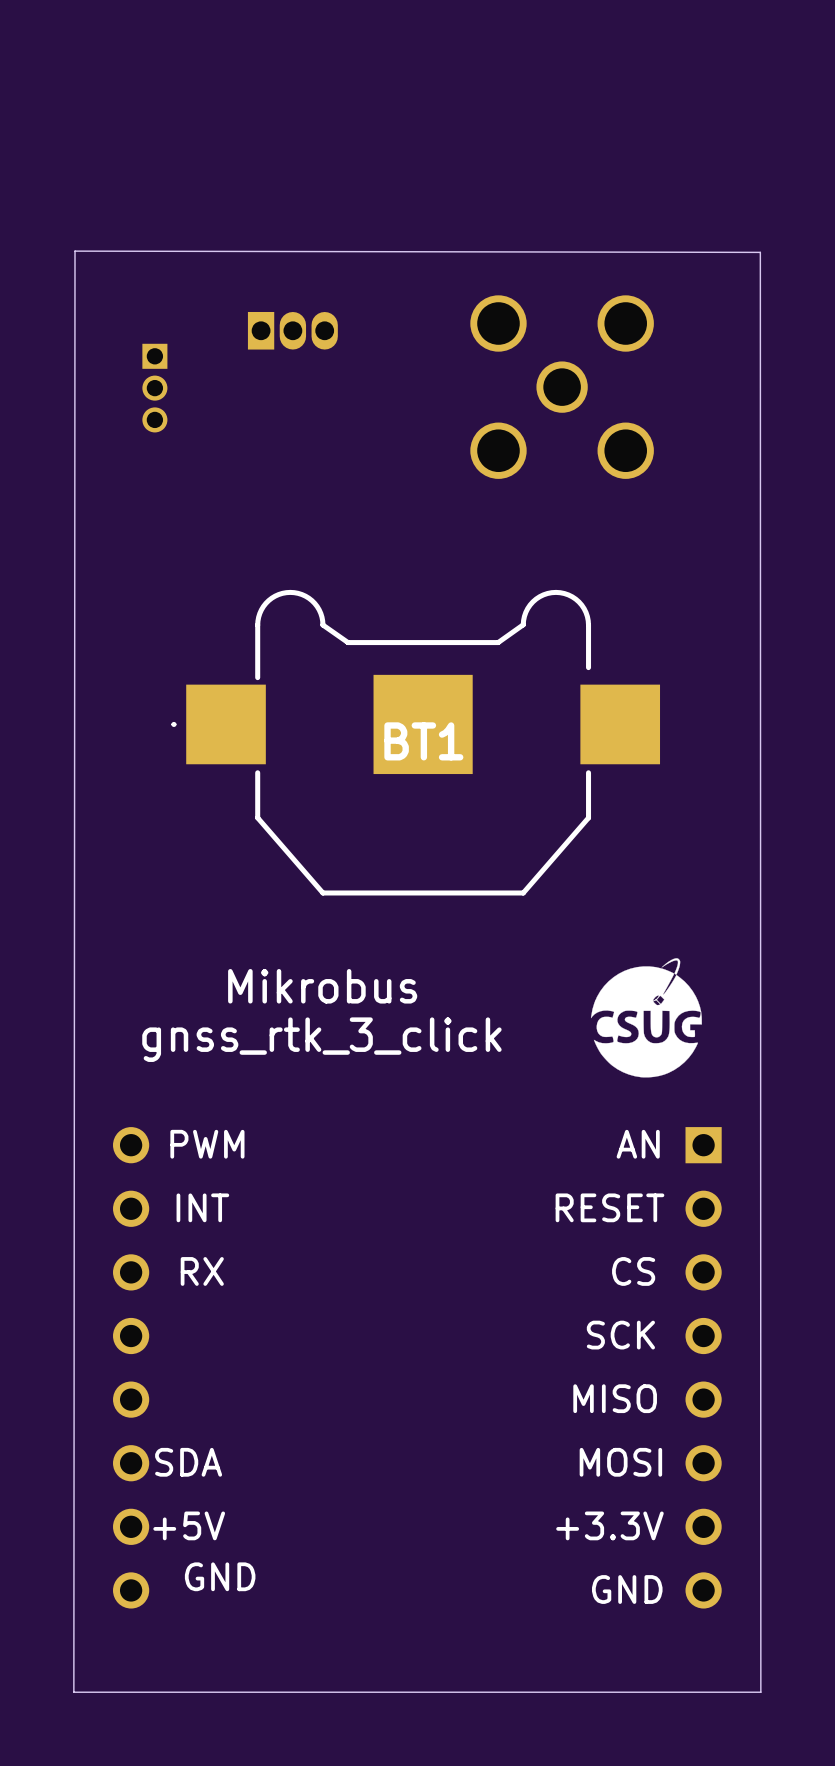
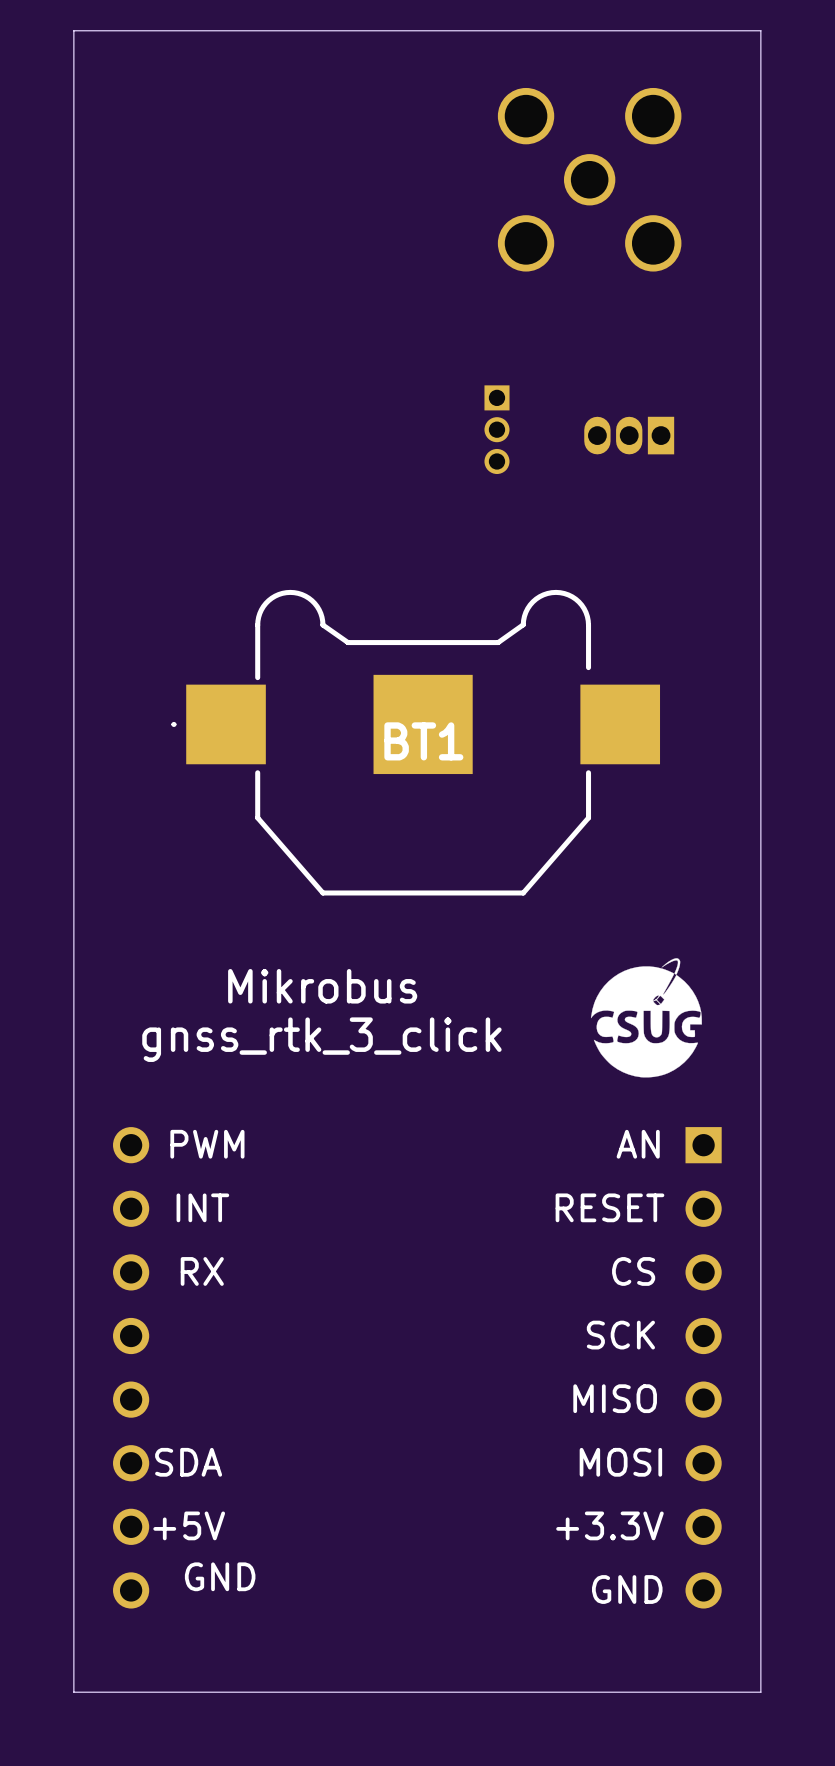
part rotation: 0° (292, 330) -> 180° (629, 435)
part position: (292, 330) -> (629, 435)
part position: (562, 387) -> (589, 179)
part position: (154, 388) -> (496, 429)
board edge: (760, 1692) (760, 252) (75, 251) (73, 1692) -> (760, 1692) (760, 30) (73, 30) (73, 1692)

